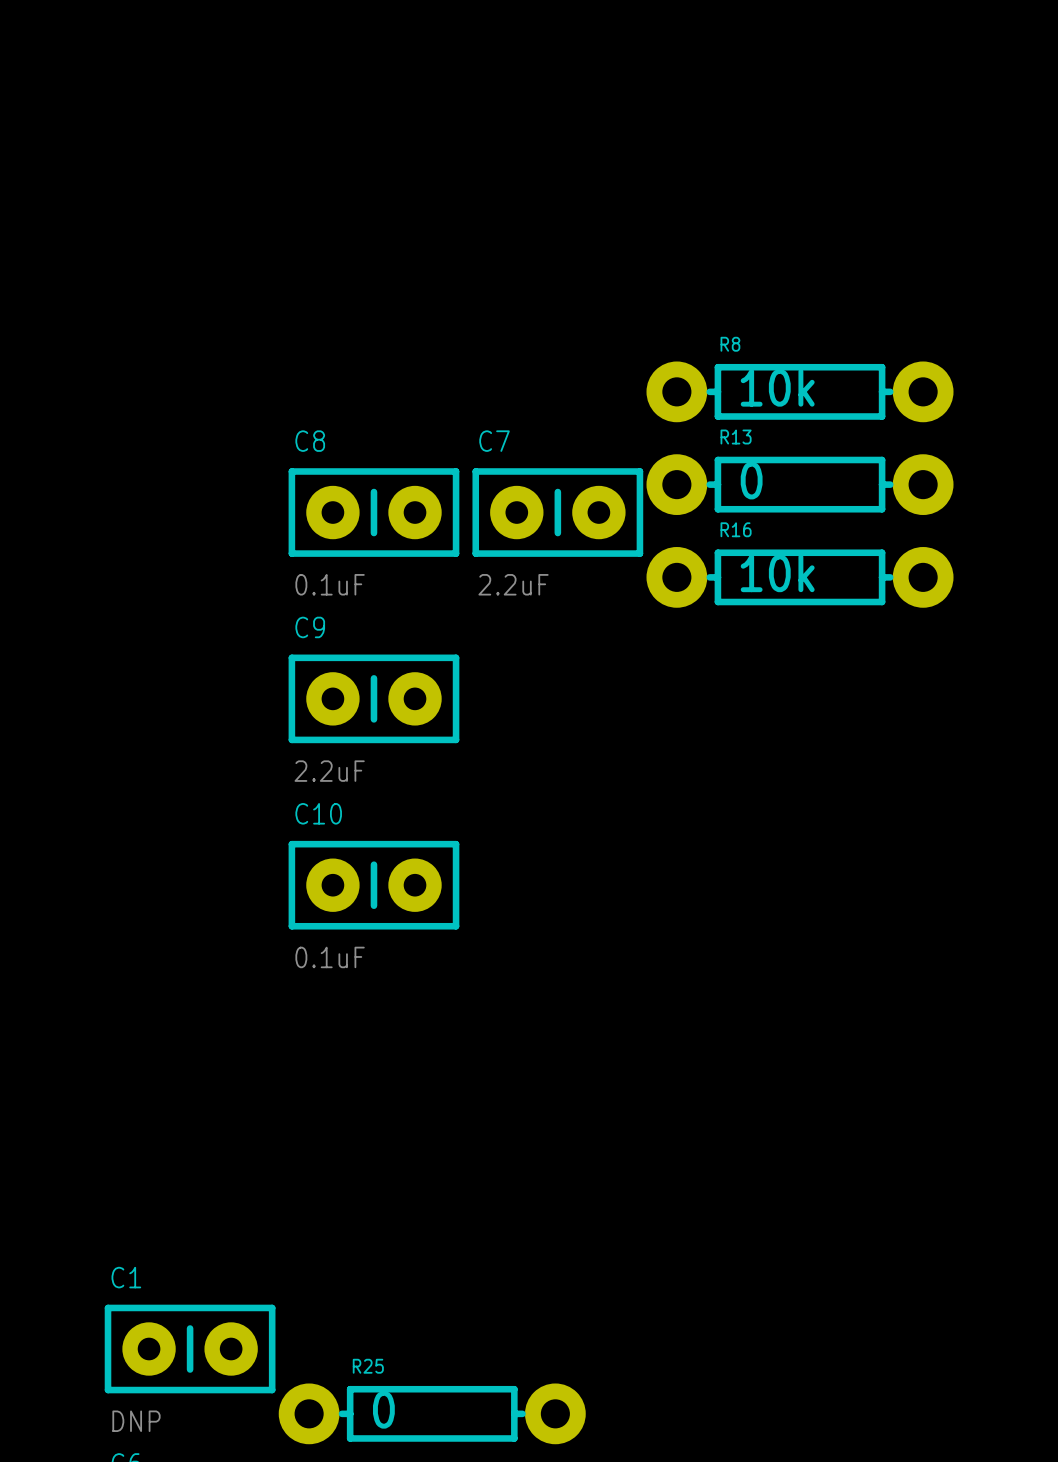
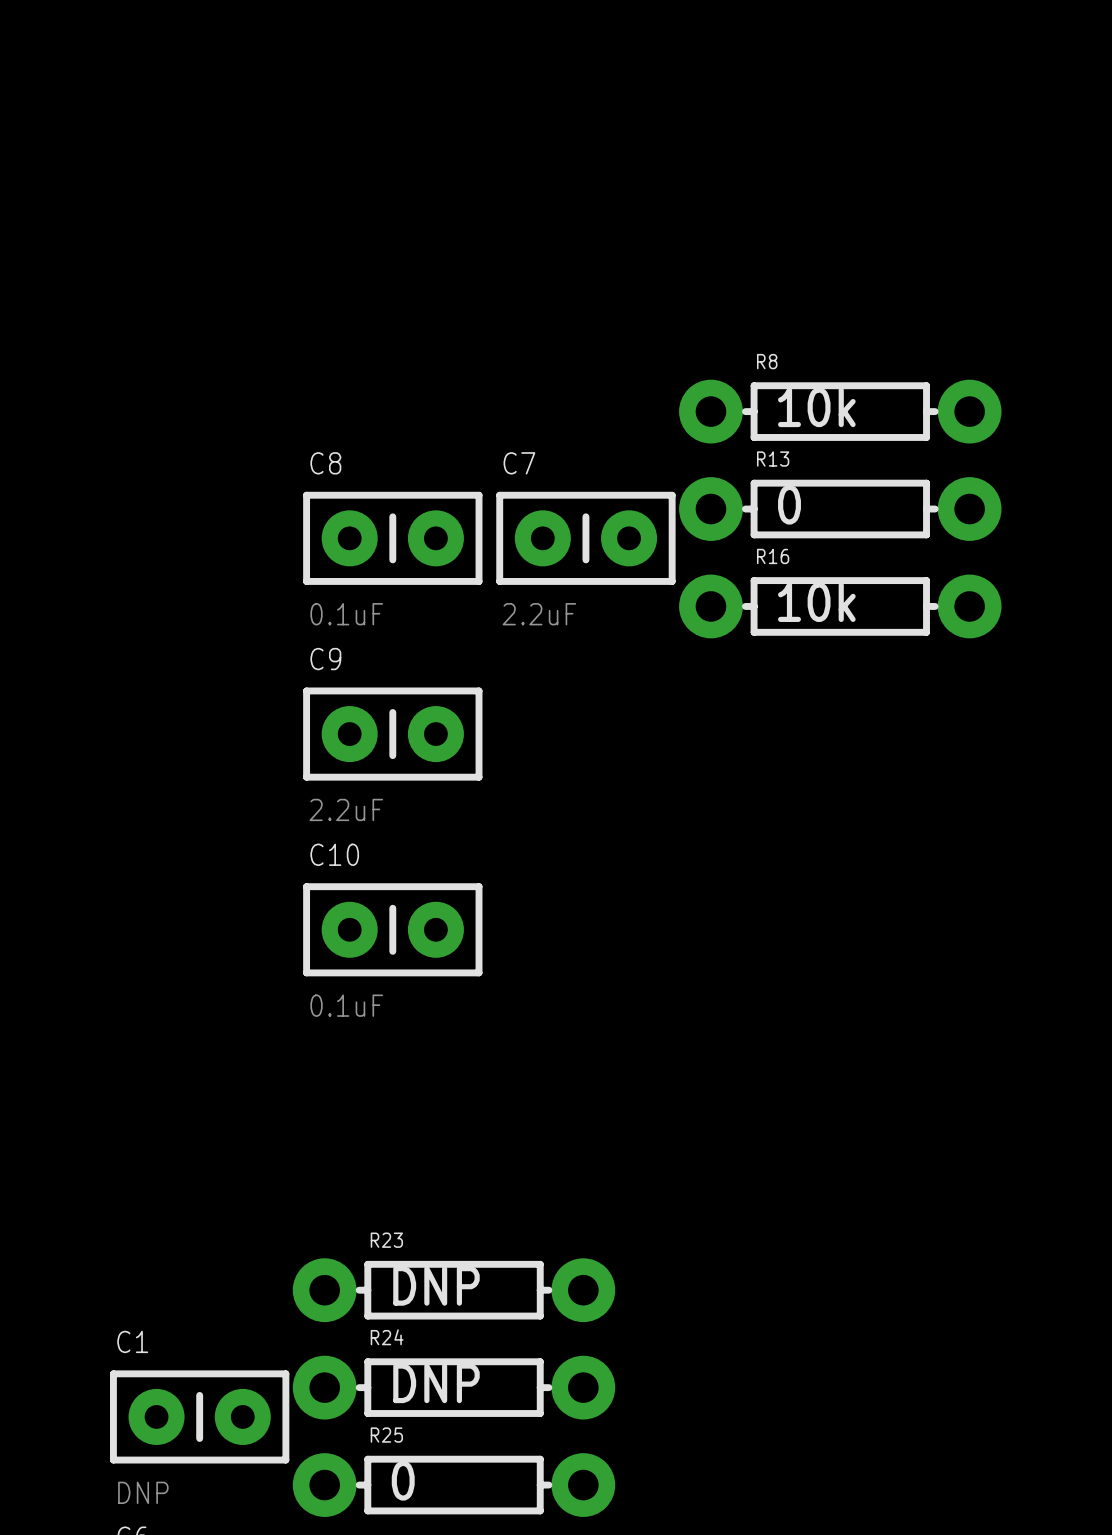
R23: none -> DNP (454, 1290)
R24: none -> DNP (454, 1387)

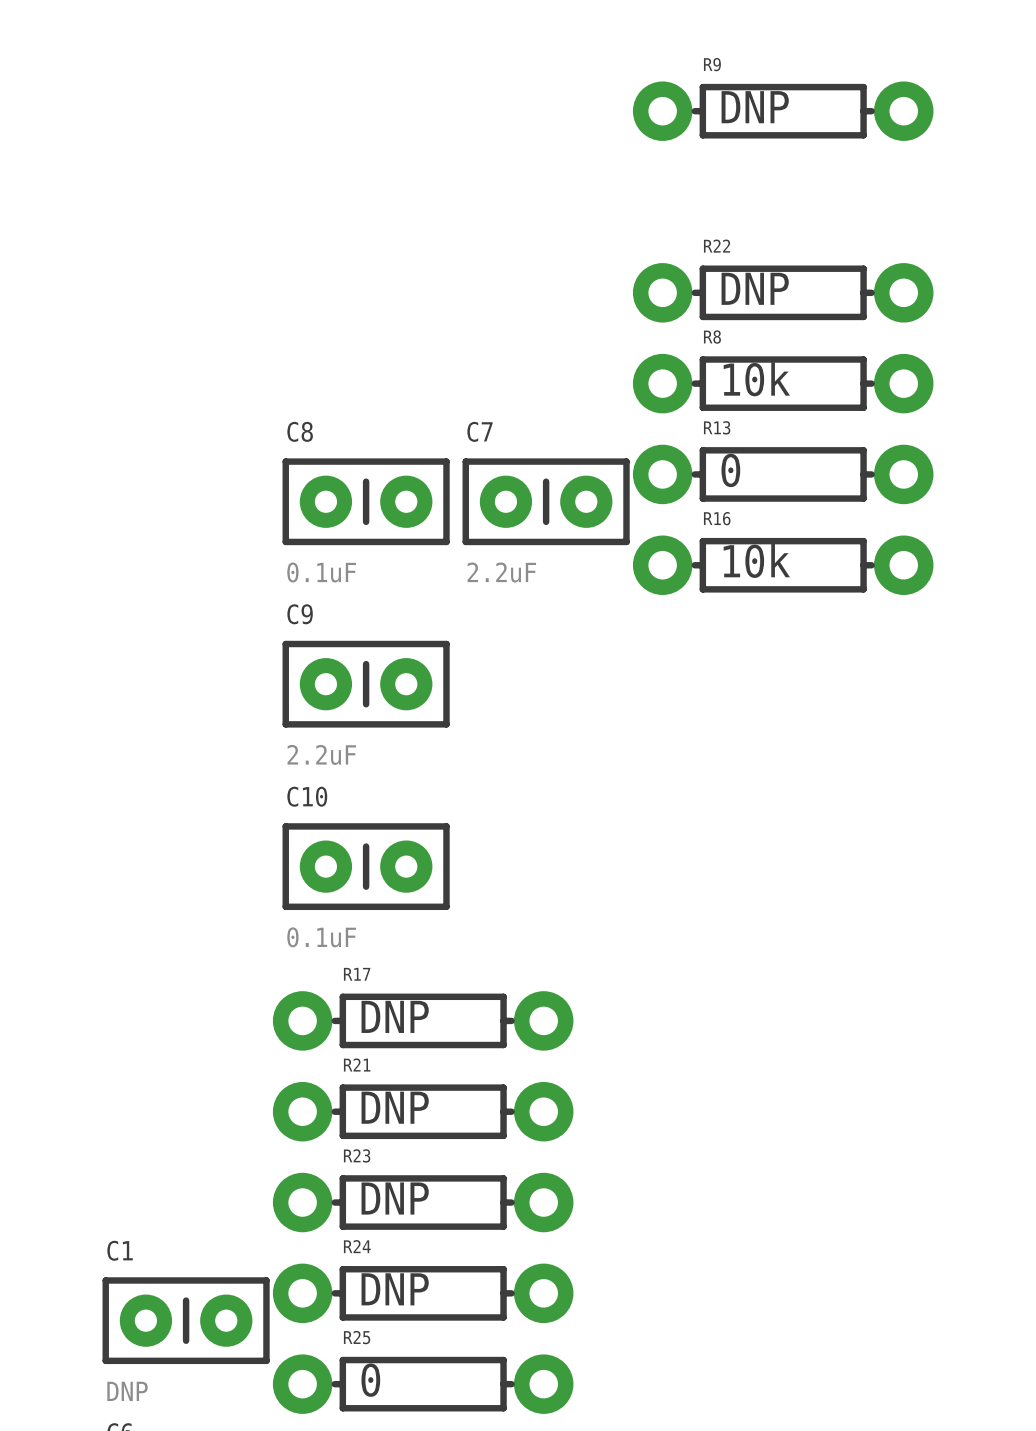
R9: none -> DNP (783, 111)
R22: none -> DNP (783, 292)
R17: none -> DNP (423, 1020)
R21: none -> DNP (423, 1111)

